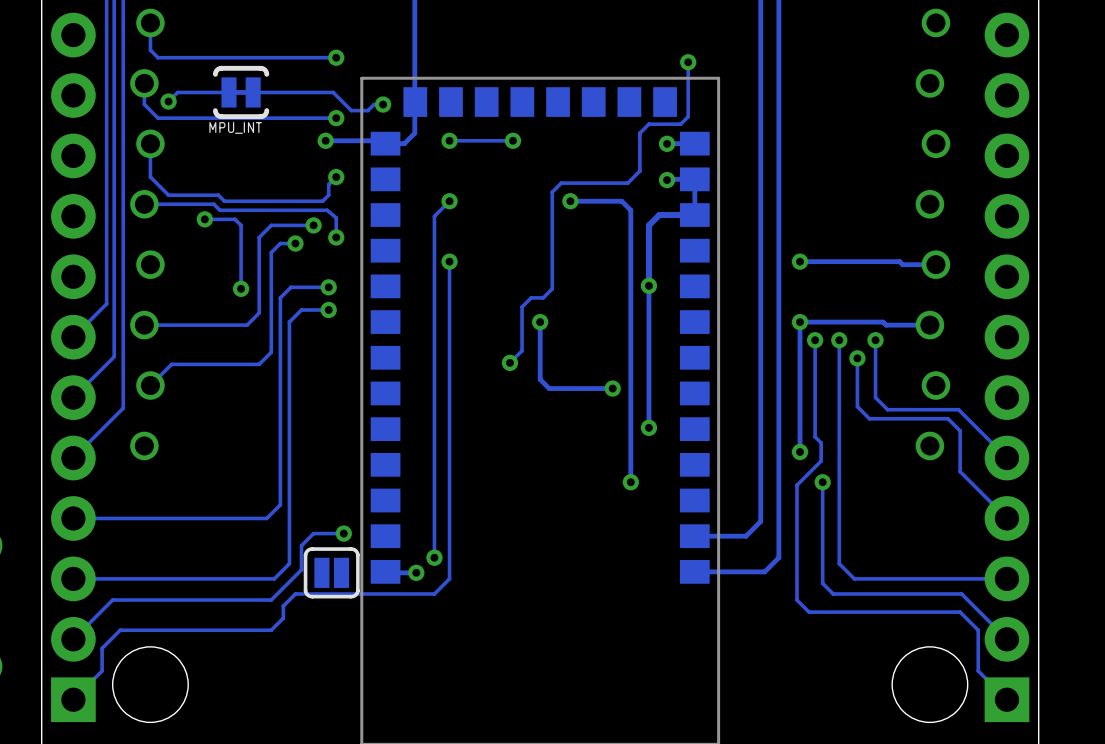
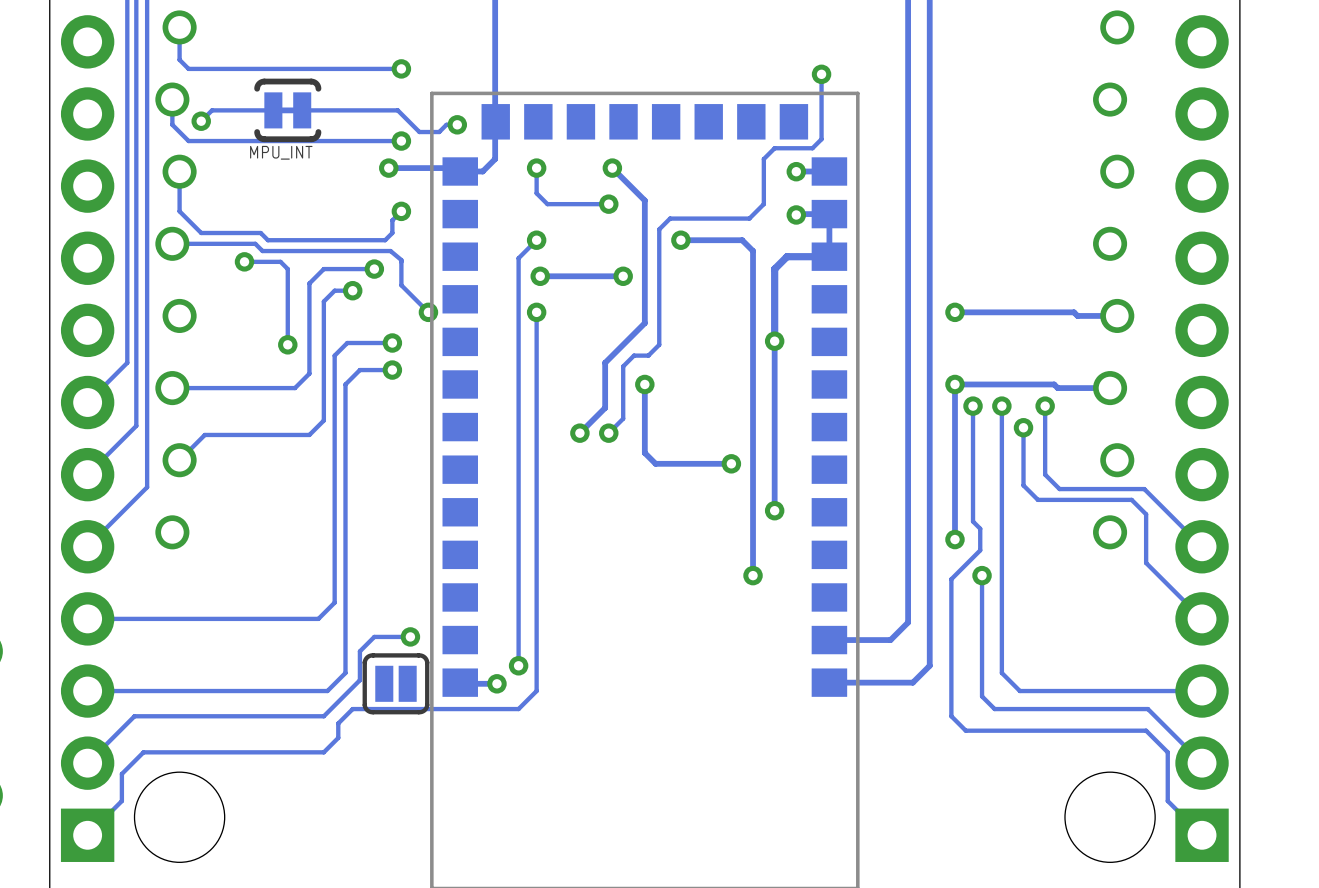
track: (513, 140) (449, 140) -> (608, 204) (547, 204) (536, 193) (536, 168)
track: none -> (612, 168) (644, 200) (644, 323) (605, 362) (605, 407) (579, 433)
via: none -> (608, 204)
via: none -> (540, 276)
track: none -> (623, 276) (540, 276)
via: none -> (623, 276)
track: none -> (401, 283) (428, 312)
via position: (336, 237) -> (428, 312)
via: none -> (579, 433)

